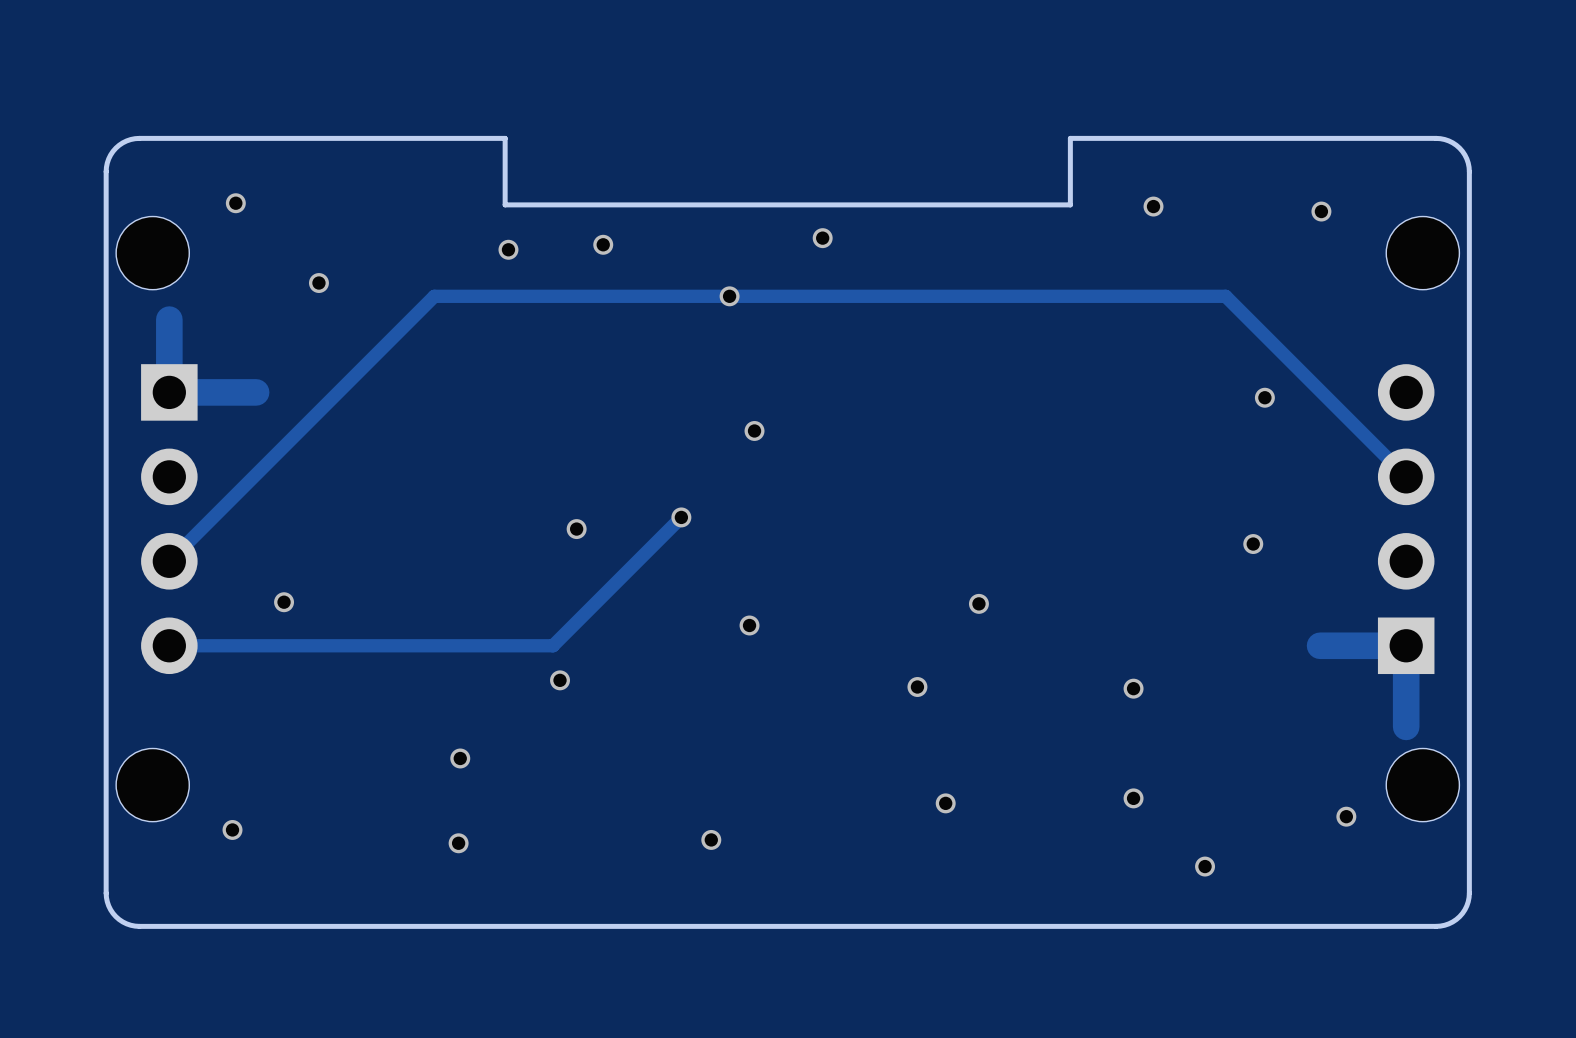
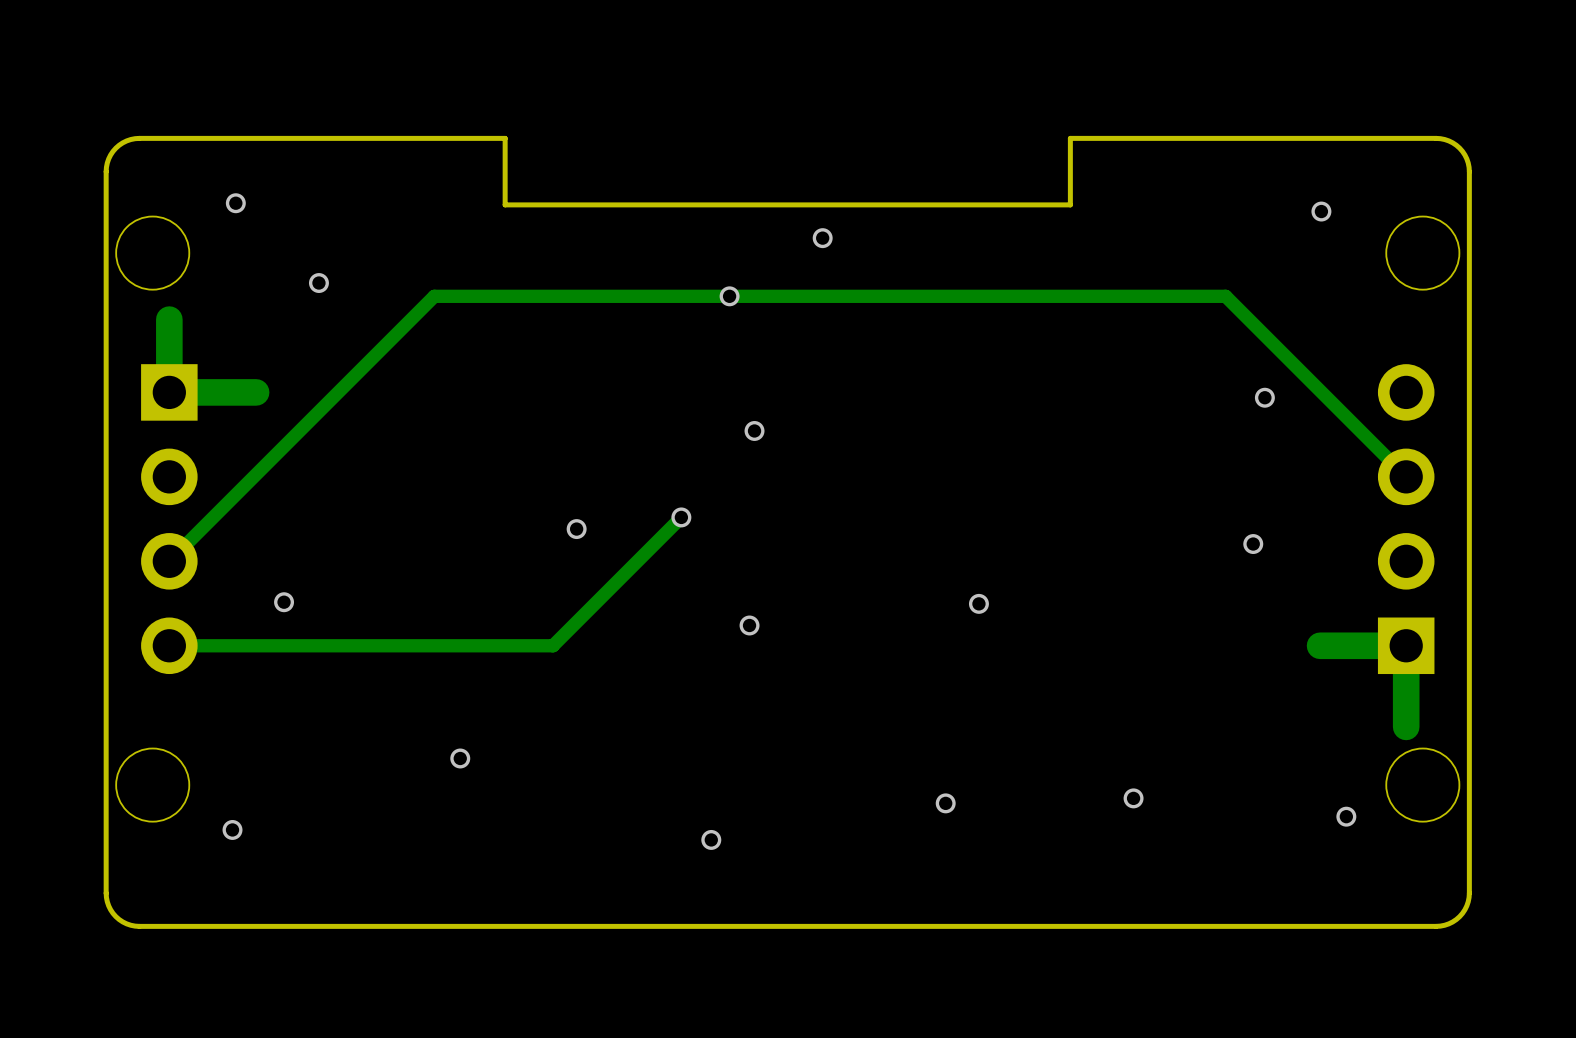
via: (1153, 206) -> none
via: (603, 244) -> none
via: (508, 249) -> none
via: (560, 680) -> none
via: (917, 687) -> none
via: (1133, 688) -> none
via: (458, 843) -> none
via: (1205, 866) -> none

